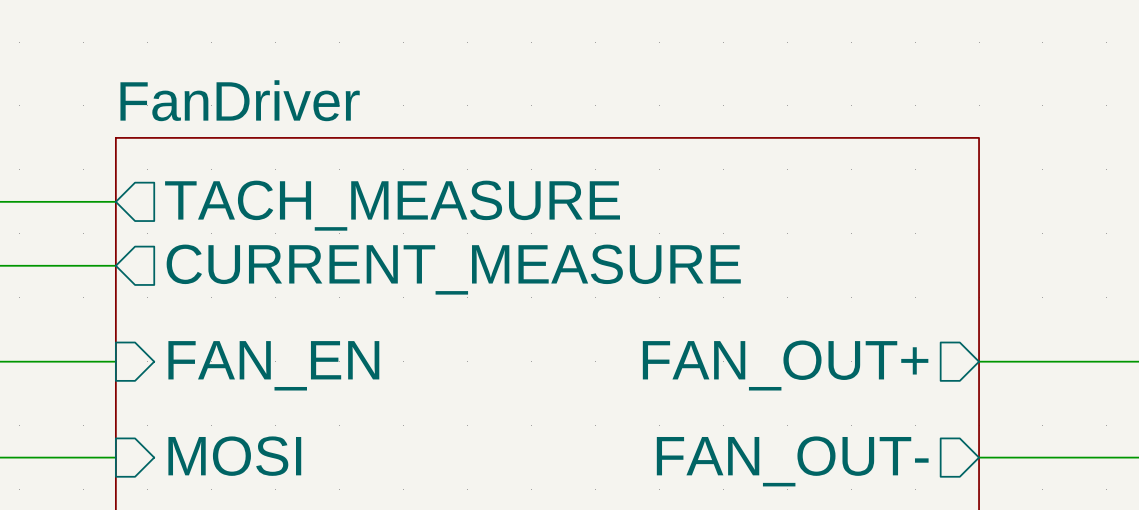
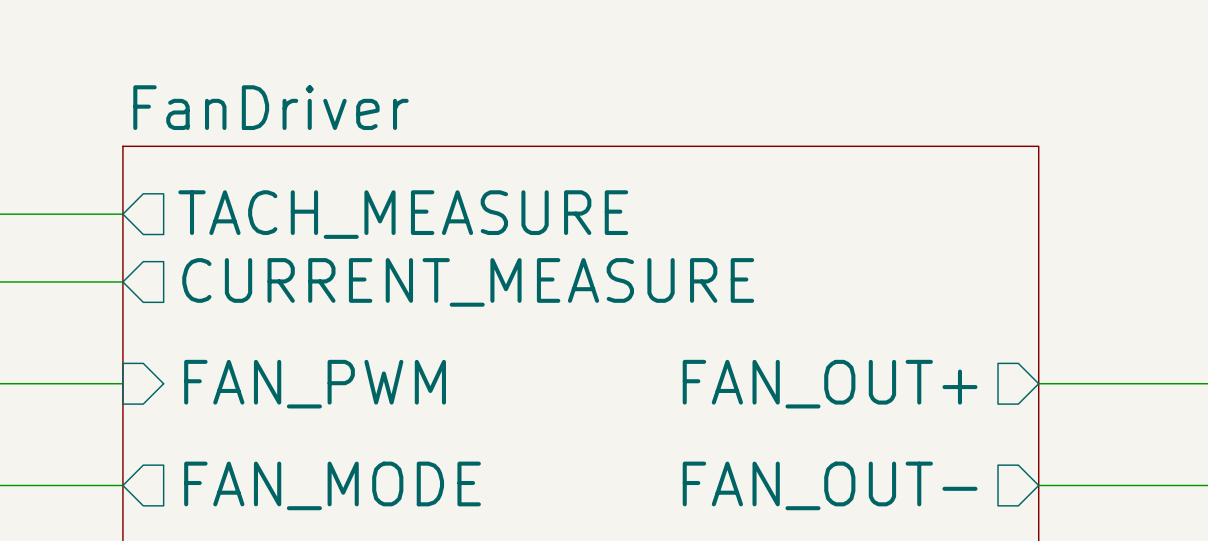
sheet pin: FAN_EN (273, 365) -> FAN_PWM (315, 384)
sheet pin shape: input (234, 456) -> output (332, 485)
sheet pin: MOSI (234, 456) -> FAN_MODE (332, 485)

